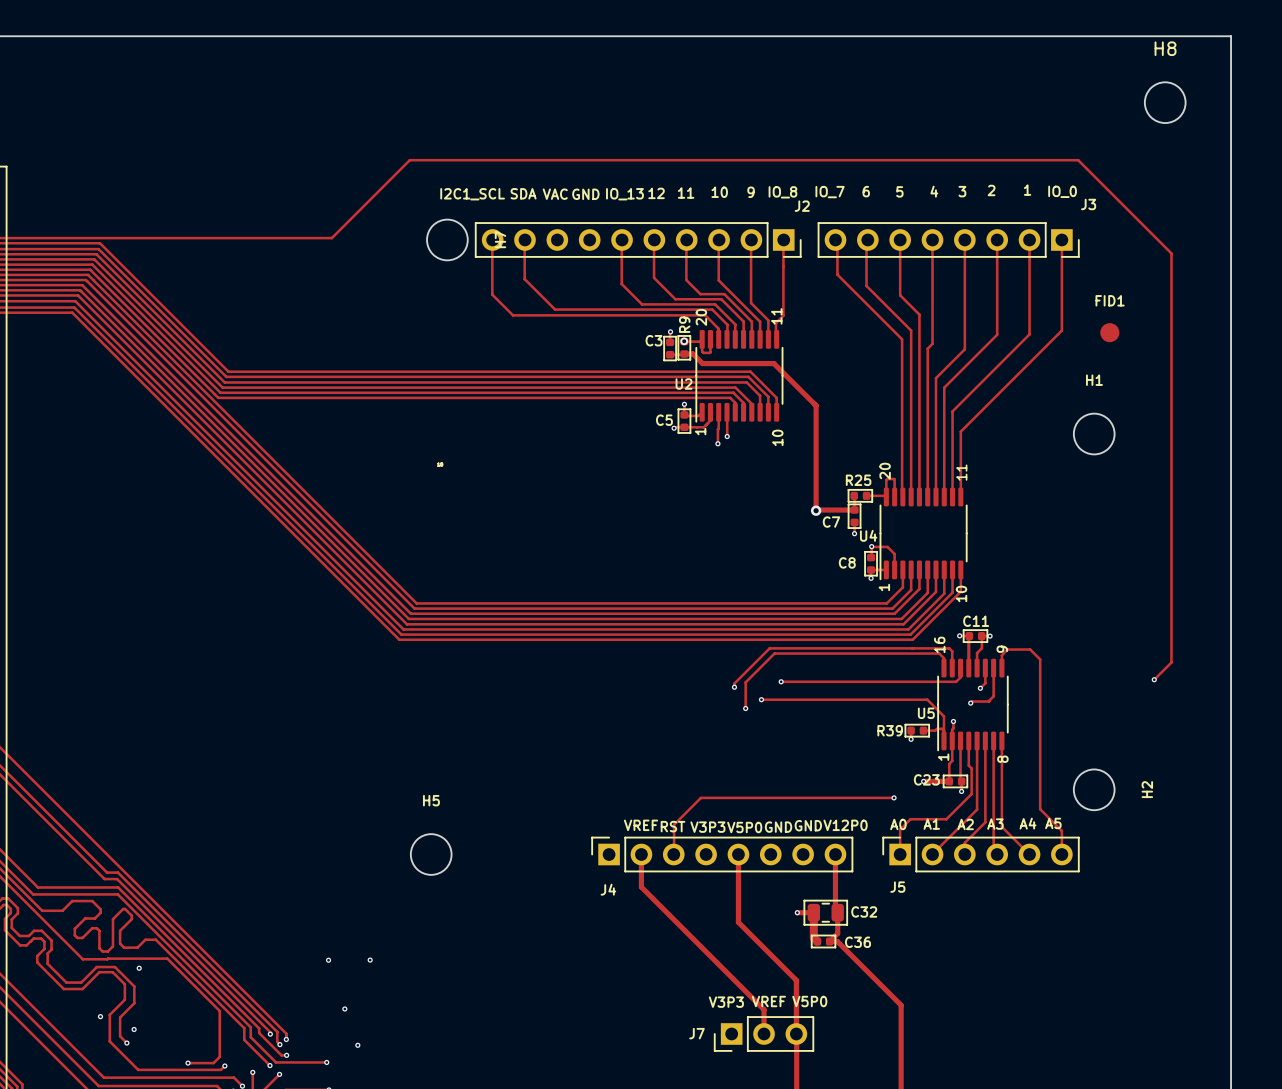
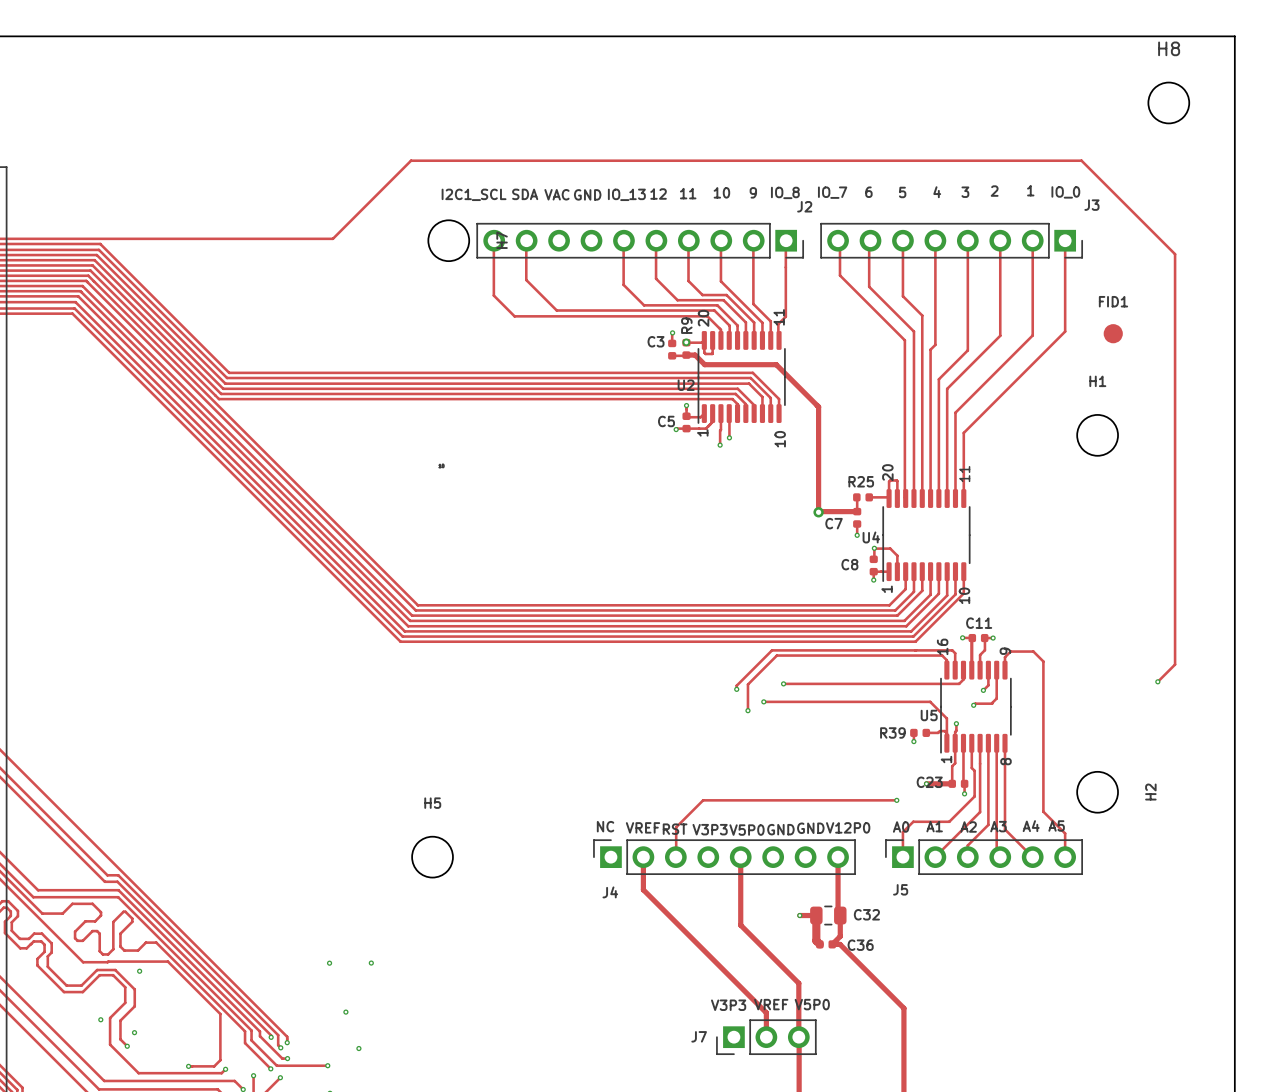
C3 footprint: [663, 335, 677, 362] -> [668, 339, 677, 360]
R9 footprint: [677, 335, 692, 361] -> [682, 338, 691, 359]
C5 footprint: [677, 408, 692, 434] -> [682, 412, 691, 433]
R25 footprint: [847, 489, 873, 503] -> [853, 493, 873, 502]
C7 footprint: [847, 503, 862, 529] -> [853, 507, 862, 528]
C8 footprint: [864, 551, 878, 577] -> [869, 555, 878, 576]
C11 footprint: [962, 629, 989, 643] -> [968, 633, 989, 643]
R39 footprint: [904, 723, 930, 738] -> [910, 728, 931, 737]
C23 footprint: [942, 774, 969, 789] -> [948, 779, 969, 788]
text: none -> NC (605, 826)
C32 footprint: [803, 899, 848, 926] -> [810, 905, 847, 926]
C36 footprint: [810, 934, 837, 949] -> [816, 940, 837, 949]

